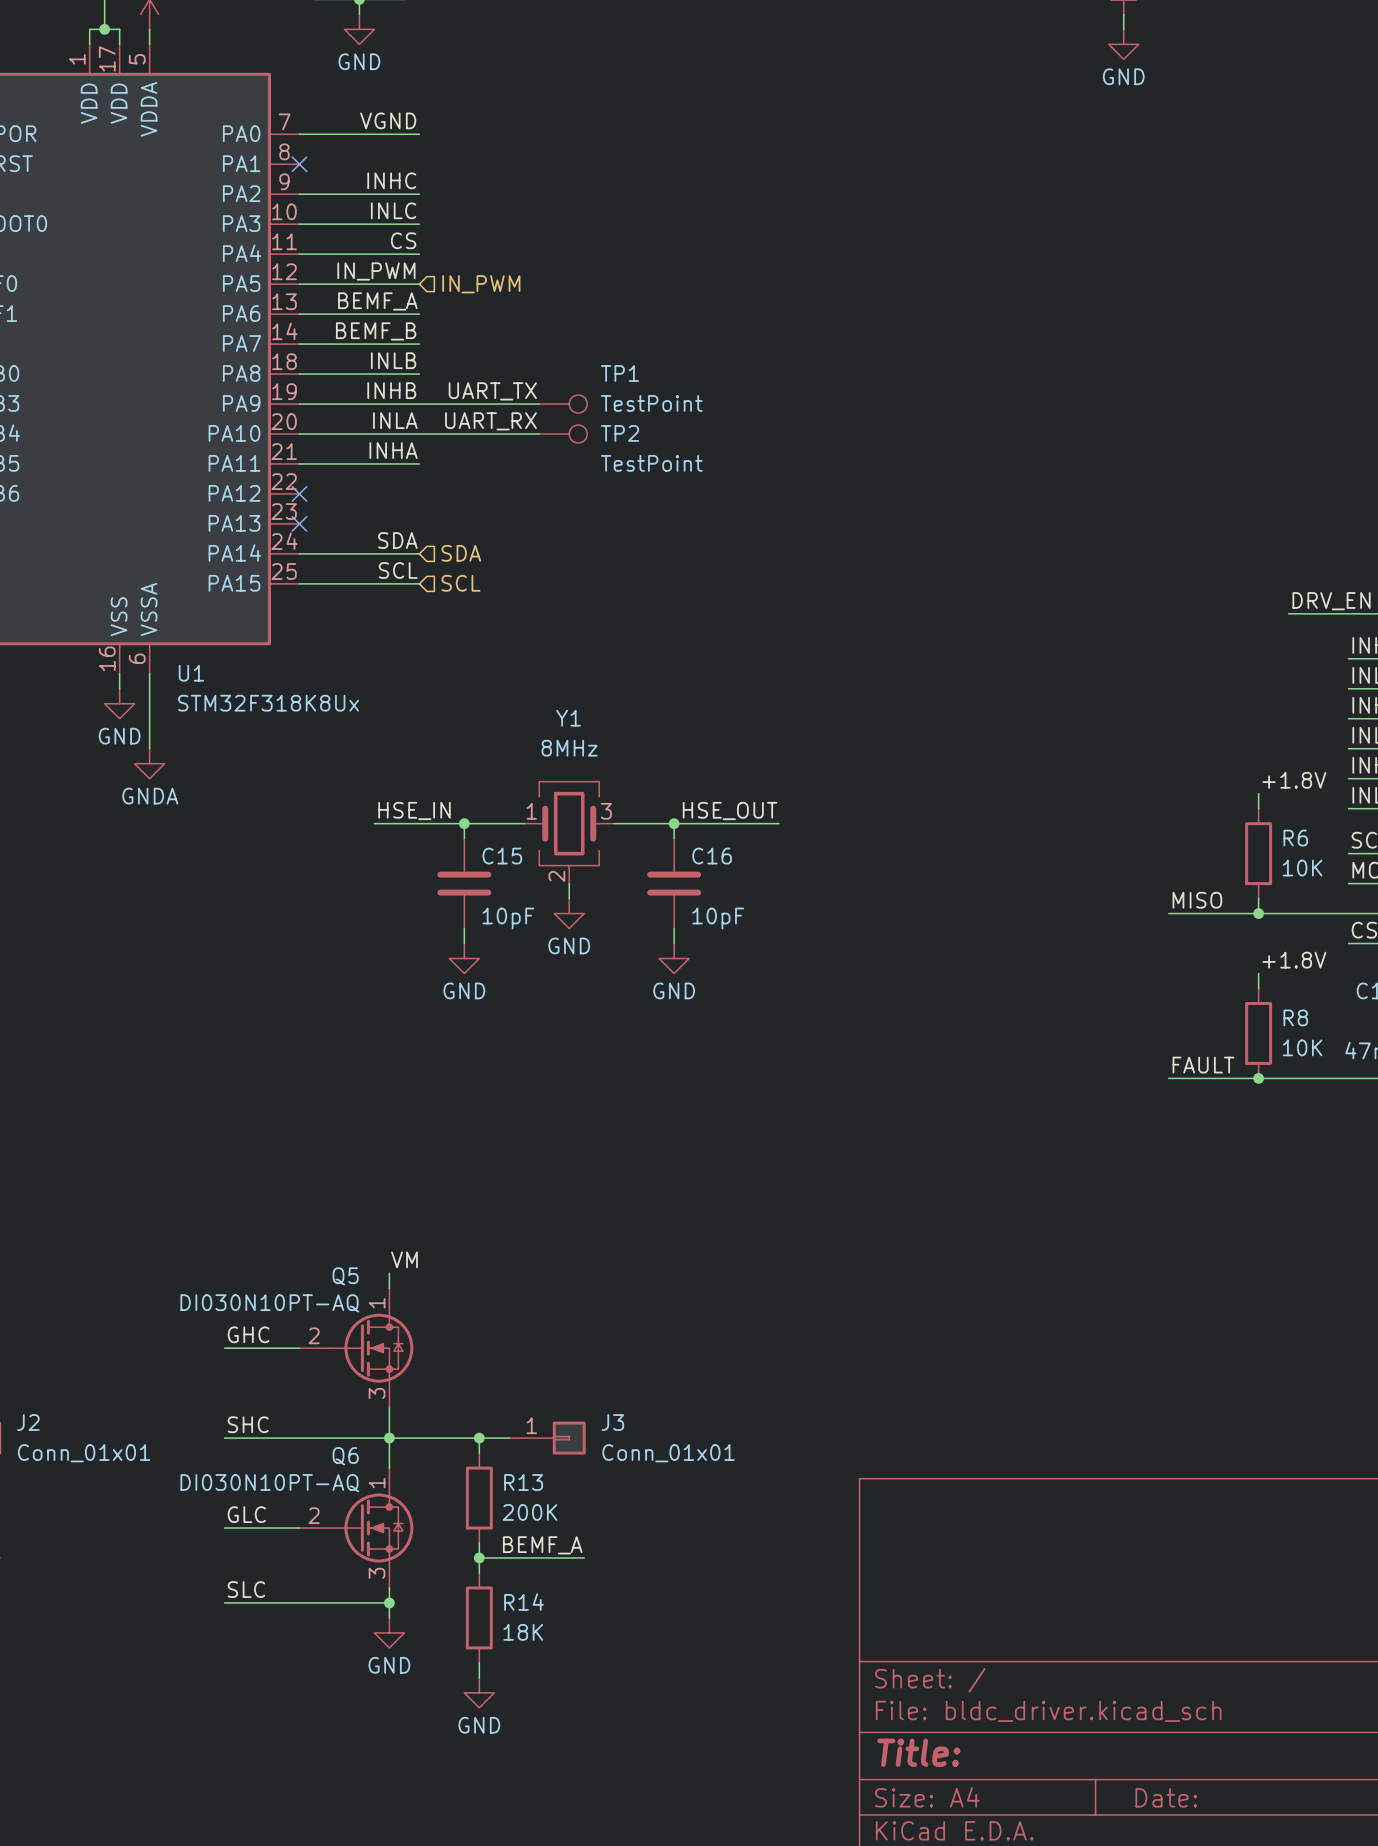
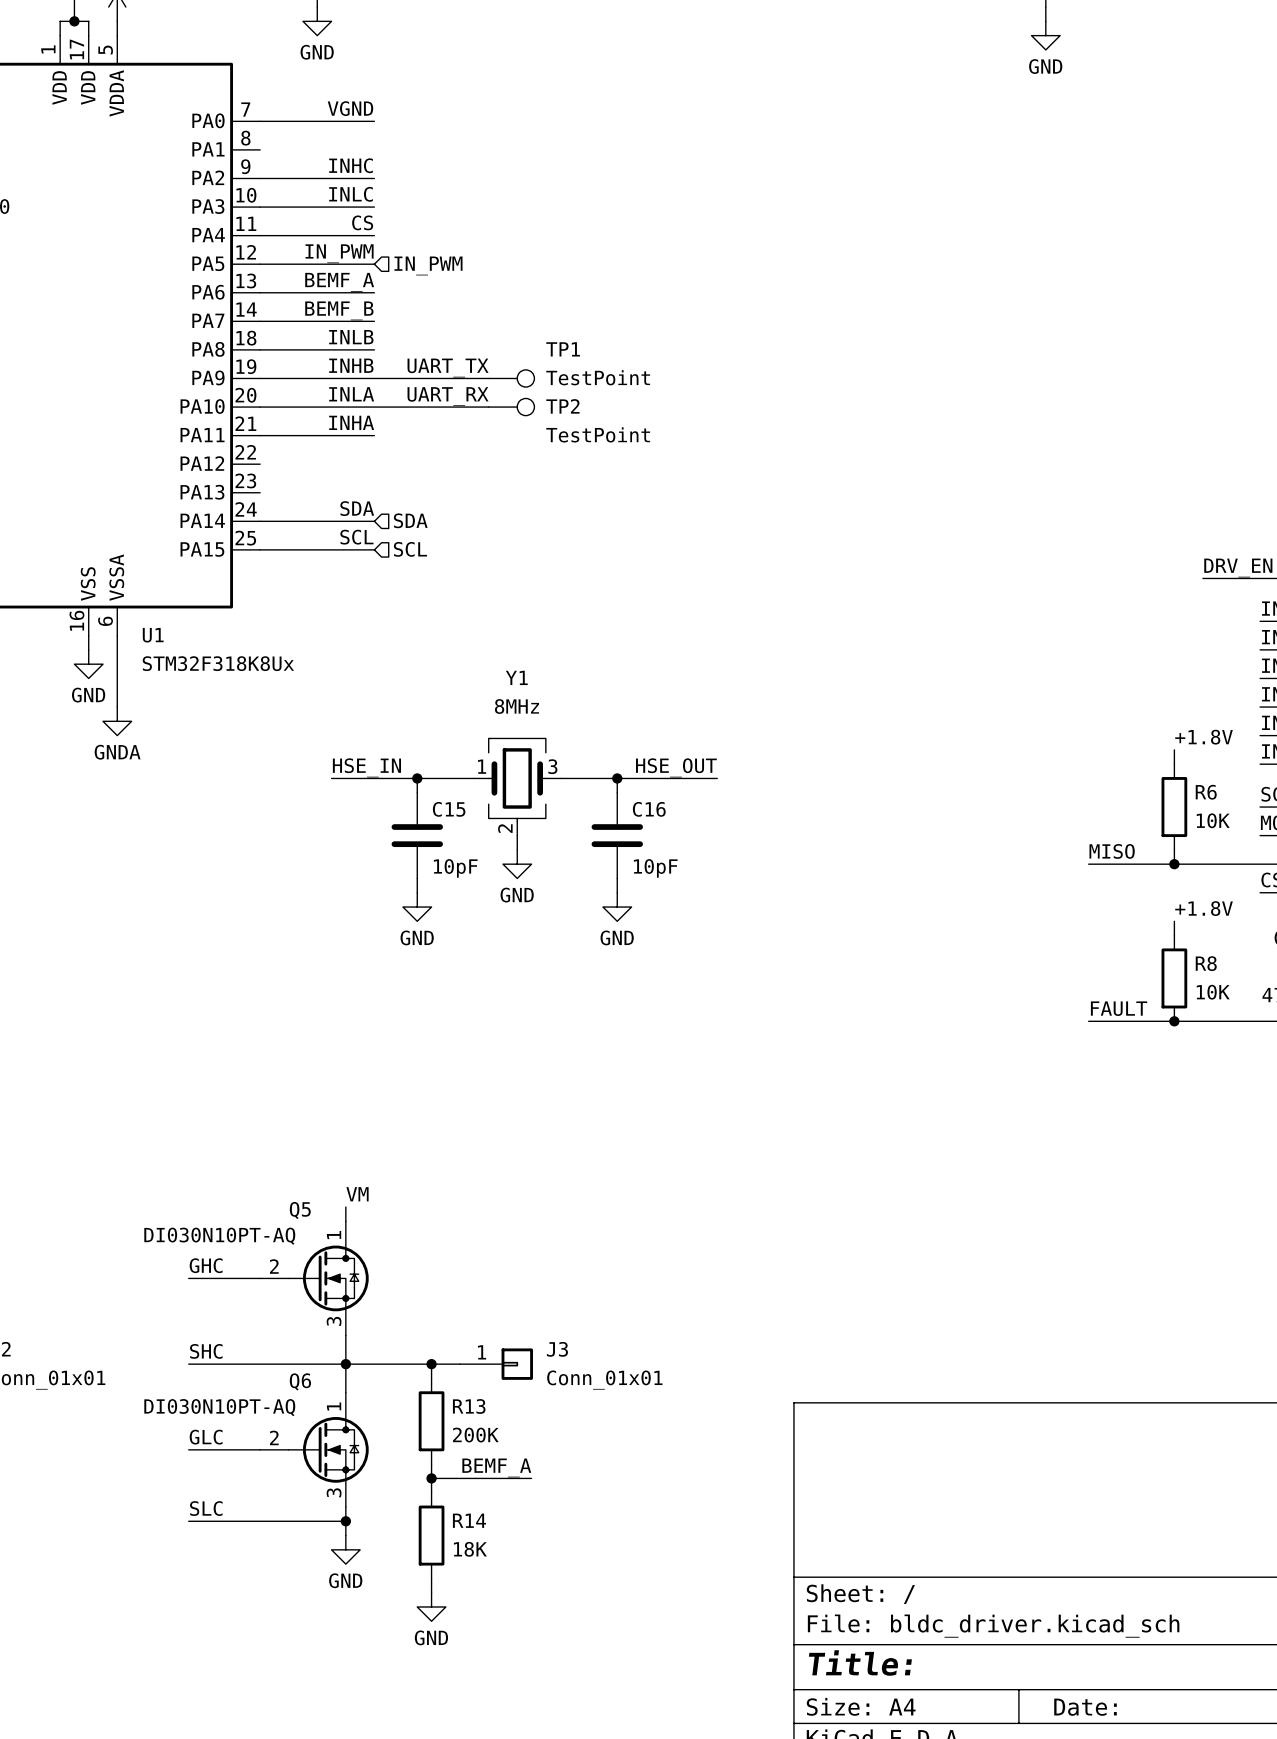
no-connect mark: (299, 164) -> none
no-connect mark: (299, 493) -> none
no-connect mark: (299, 523) -> none

